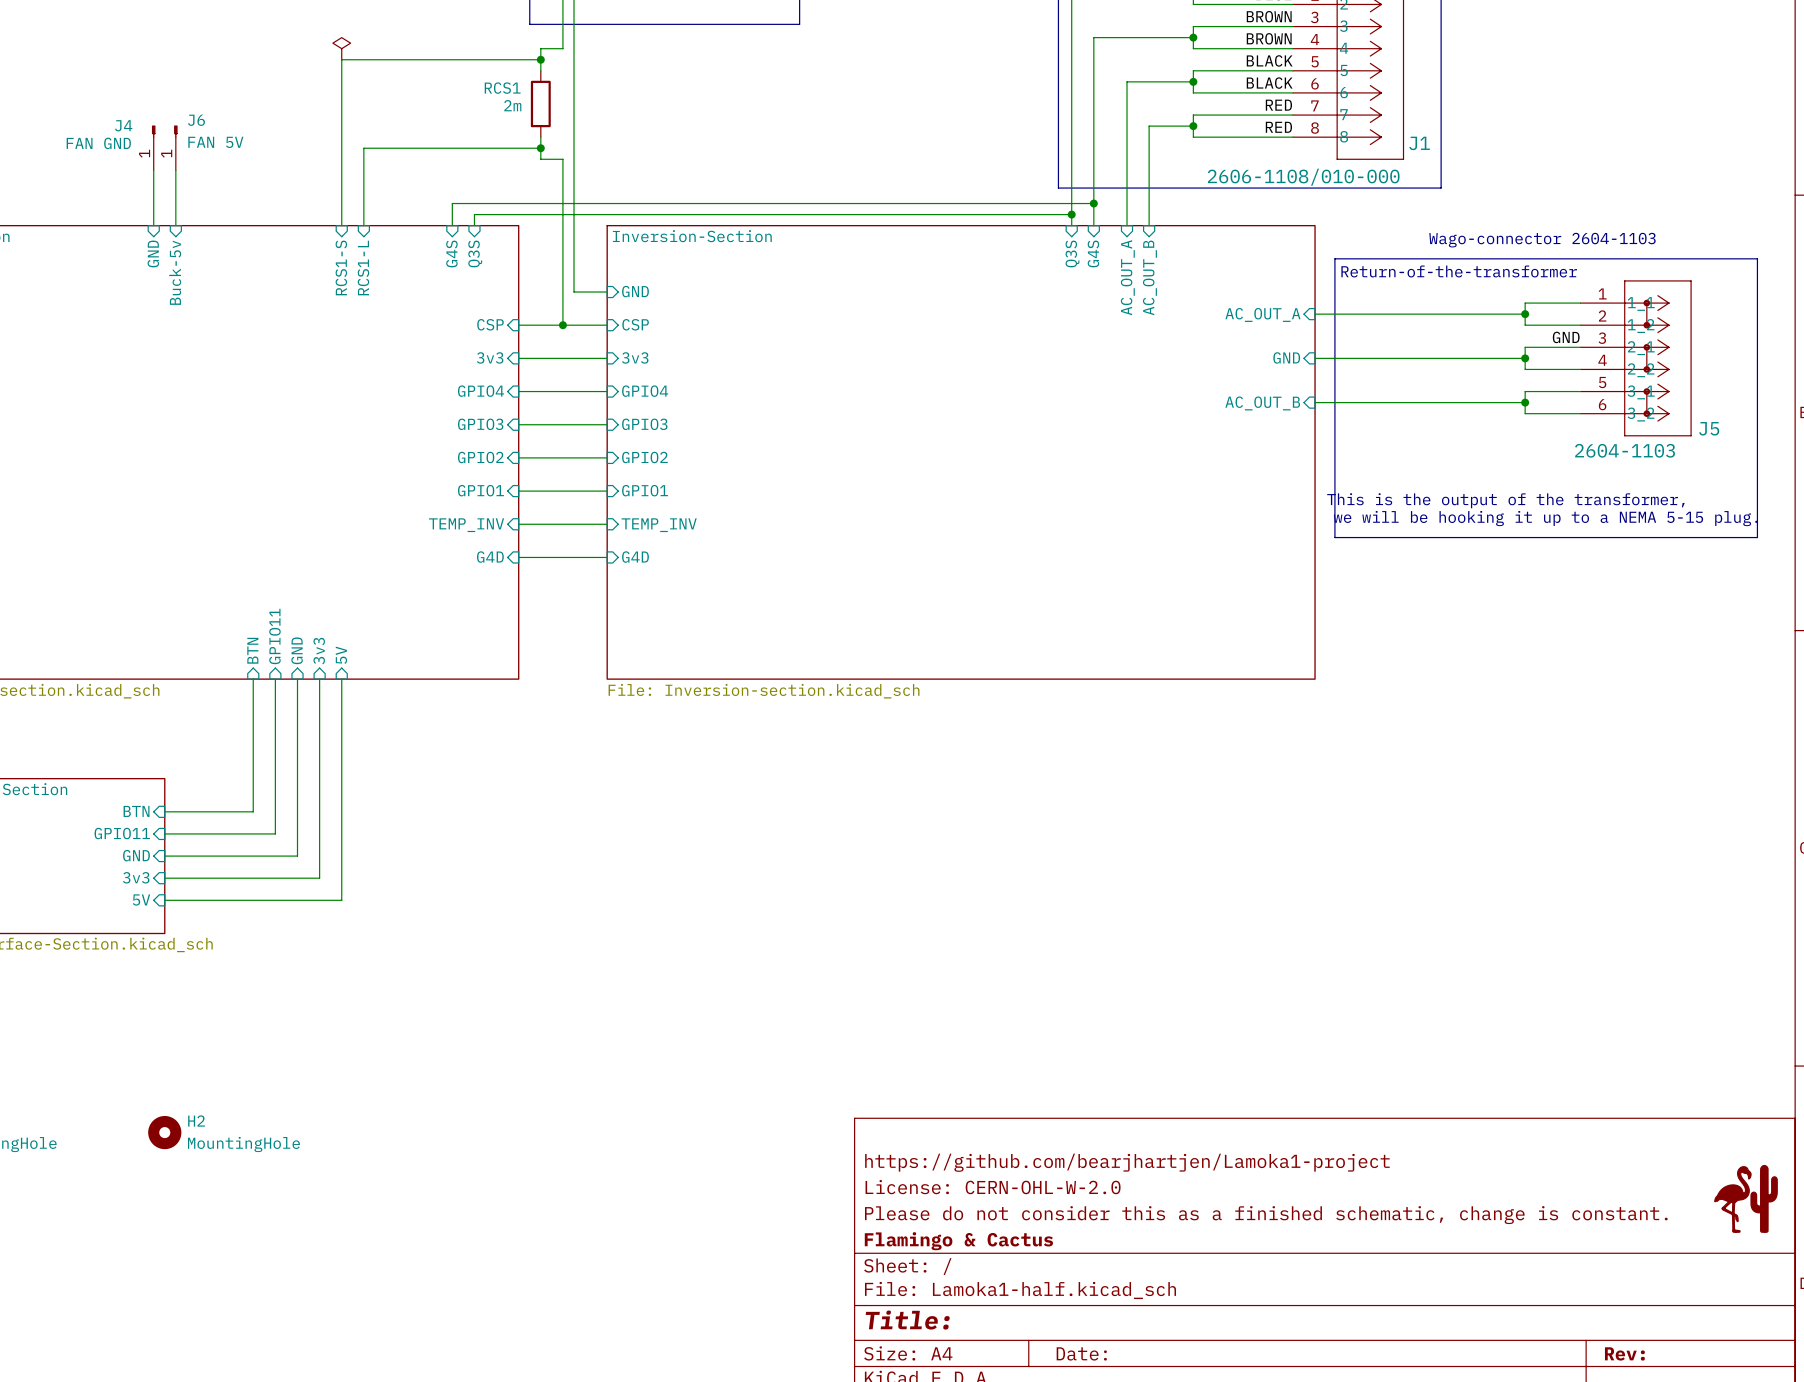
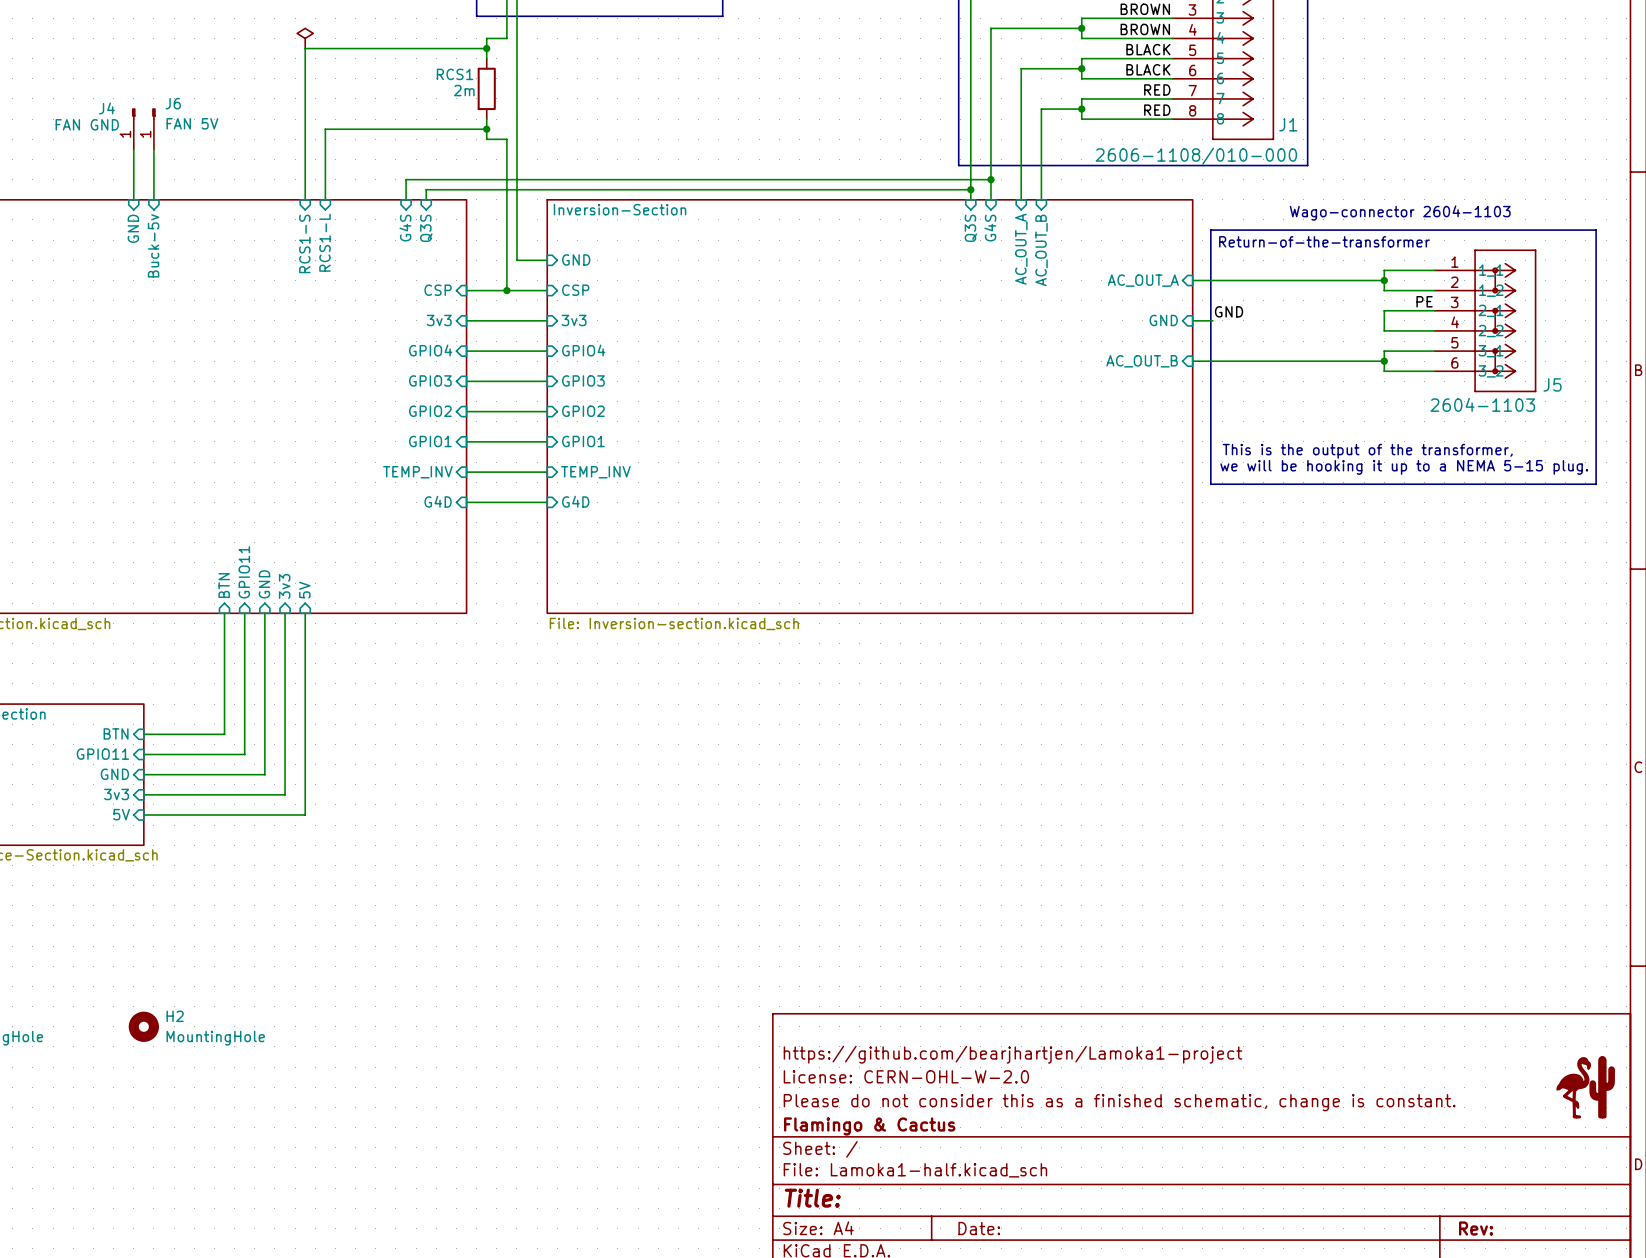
label: GND (1566, 337) -> PE (1424, 301)
label: none -> GND (1229, 311)
wire: (1337, 358) (1525, 358) -> none
junction: (1525, 358) -> none

